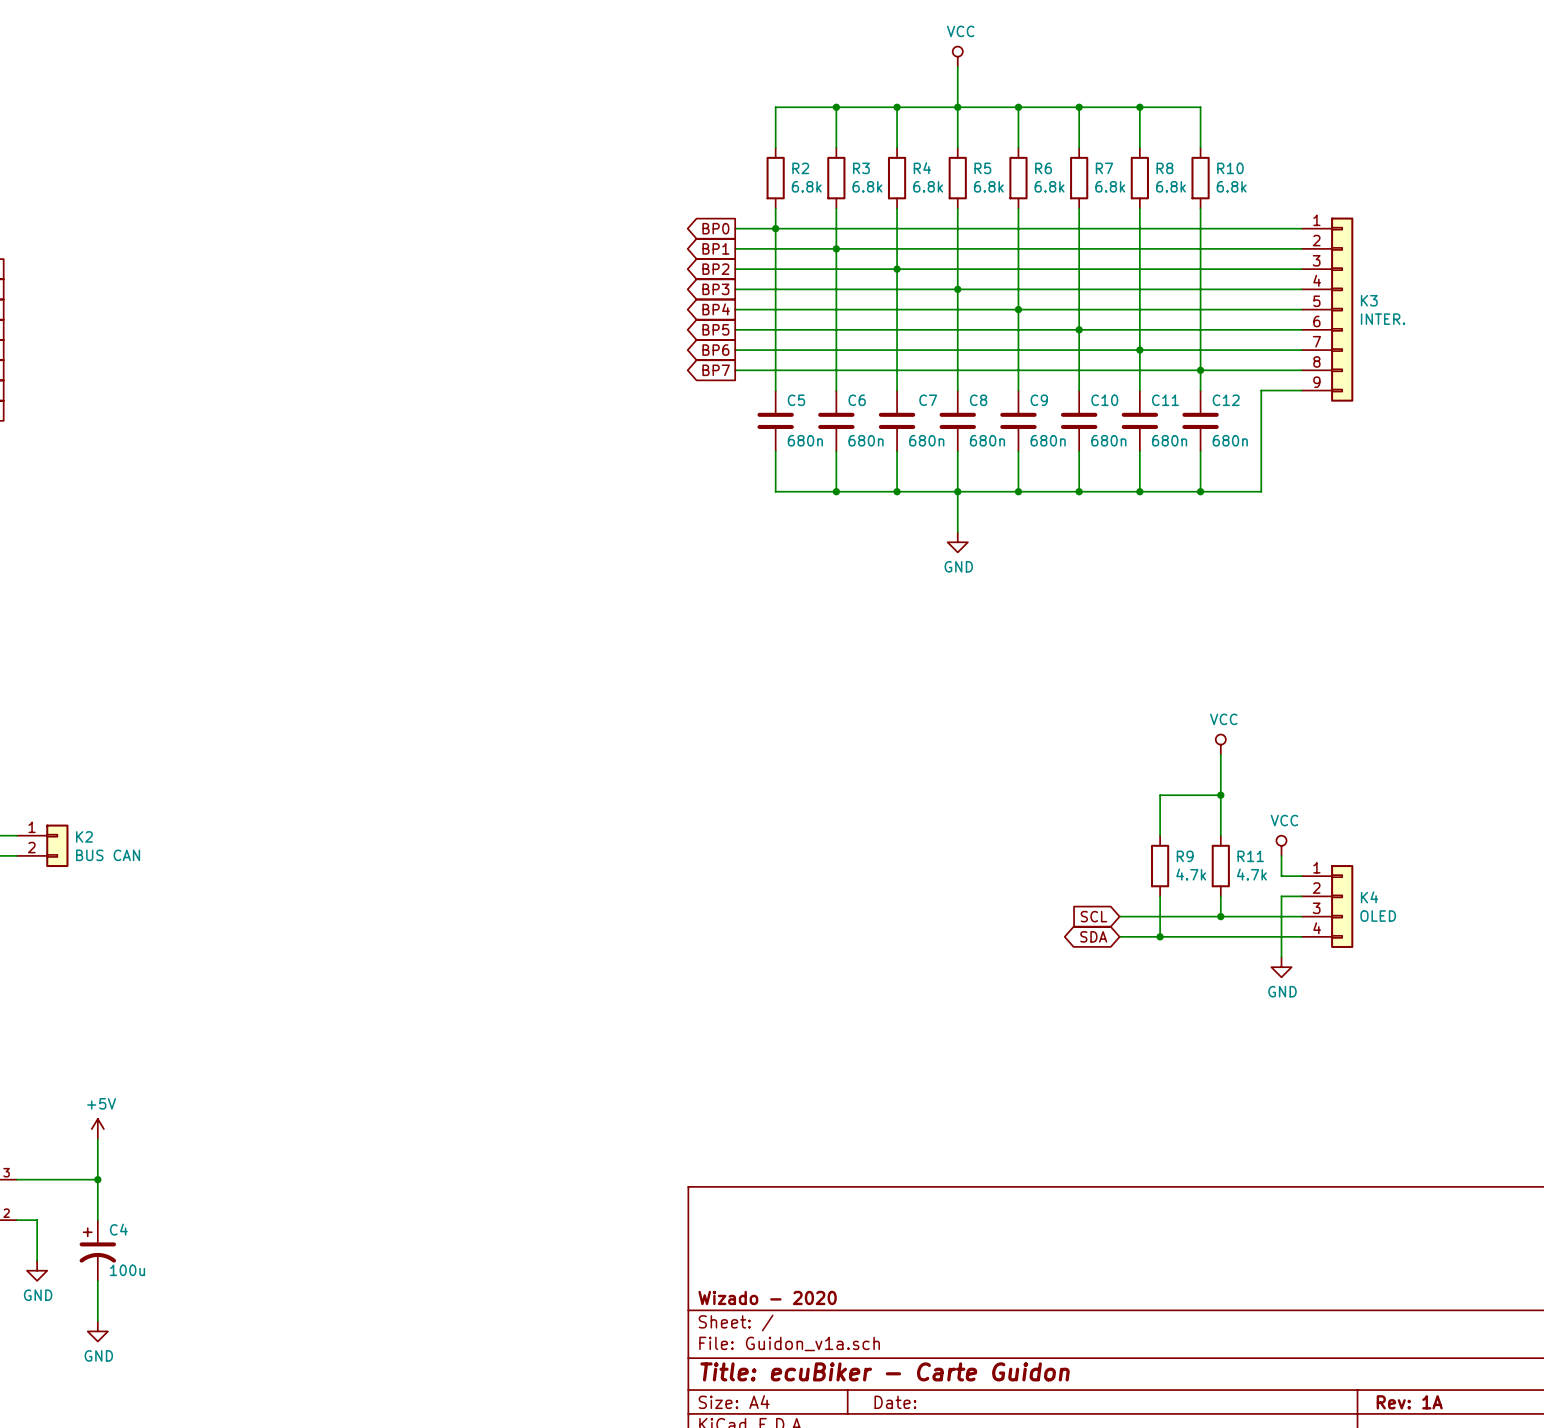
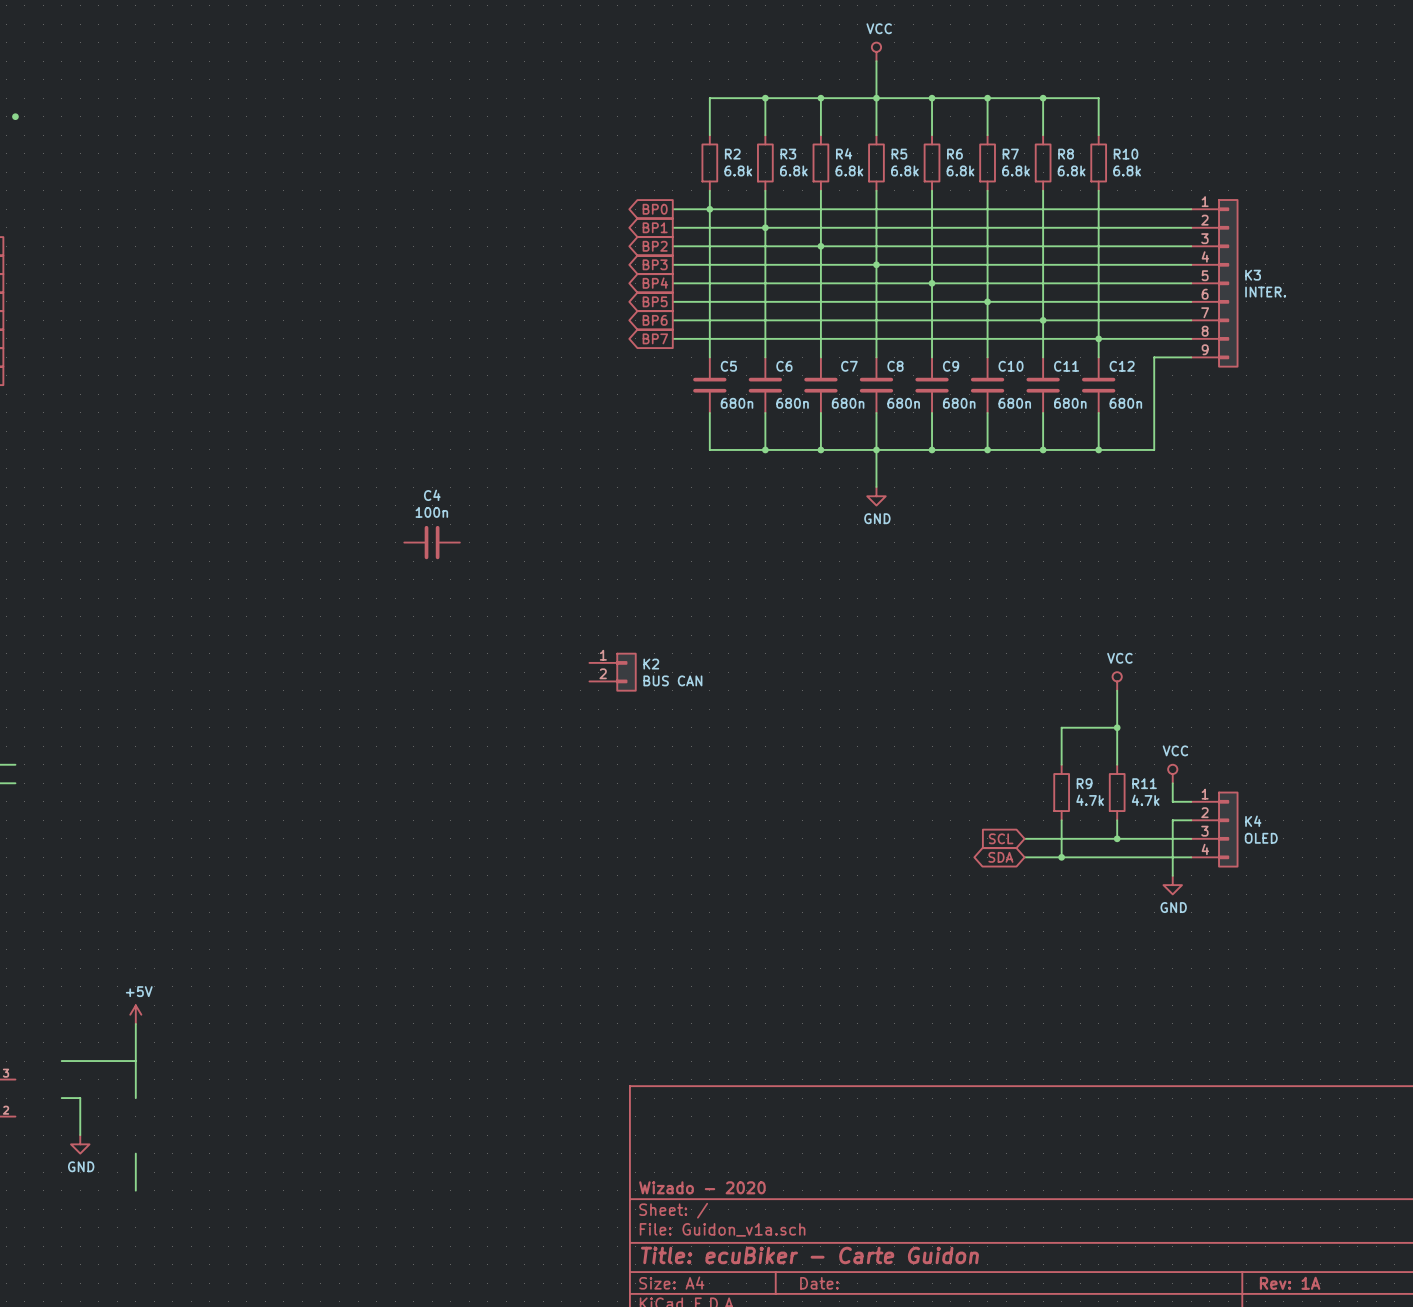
junction: none -> (15, 116)
K2 position: (42, 845) -> (613, 672)
power symbol position: +5V (97, 1129) -> +5V (135, 1014)
wire: (97, 1139) (97, 1220) -> (135, 1023) (135, 1098)
wire: (16, 1179) (97, 1179) -> (61, 1061) (135, 1061)
junction: (97, 1179) -> none
wire: (16, 1220) (37, 1220) (37, 1260) -> (61, 1098) (80, 1098) (80, 1135)
C4 symbol: [79, 1220, 117, 1281] -> [404, 525, 460, 560]
C4 name position: C4 (118, 1229) -> C4 (432, 495)
power symbol: none -> GND (80, 1144)
power symbol: GND (37, 1270) -> none
C4 value: 100u (127, 1270) -> 100n (431, 512)
wire: (97, 1280) (97, 1321) -> (135, 1153) (135, 1190)
power symbol: GND (97, 1331) -> none

